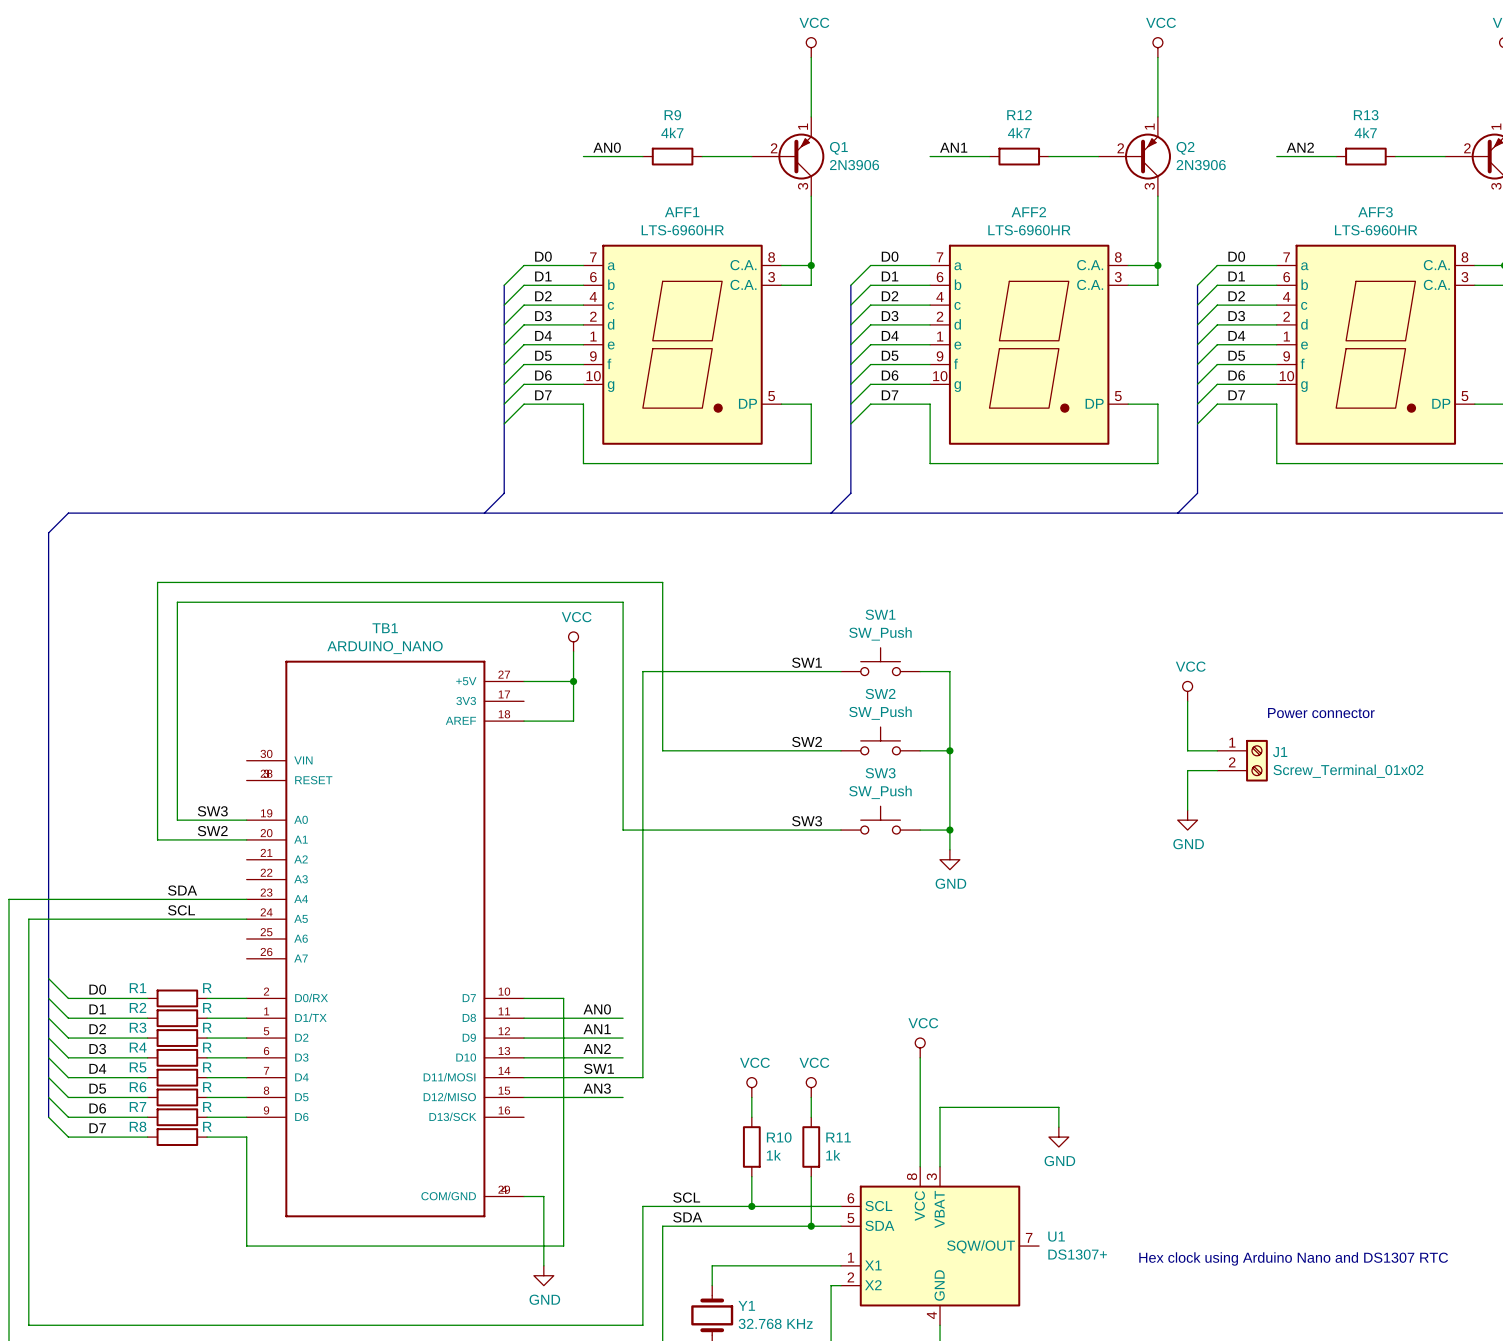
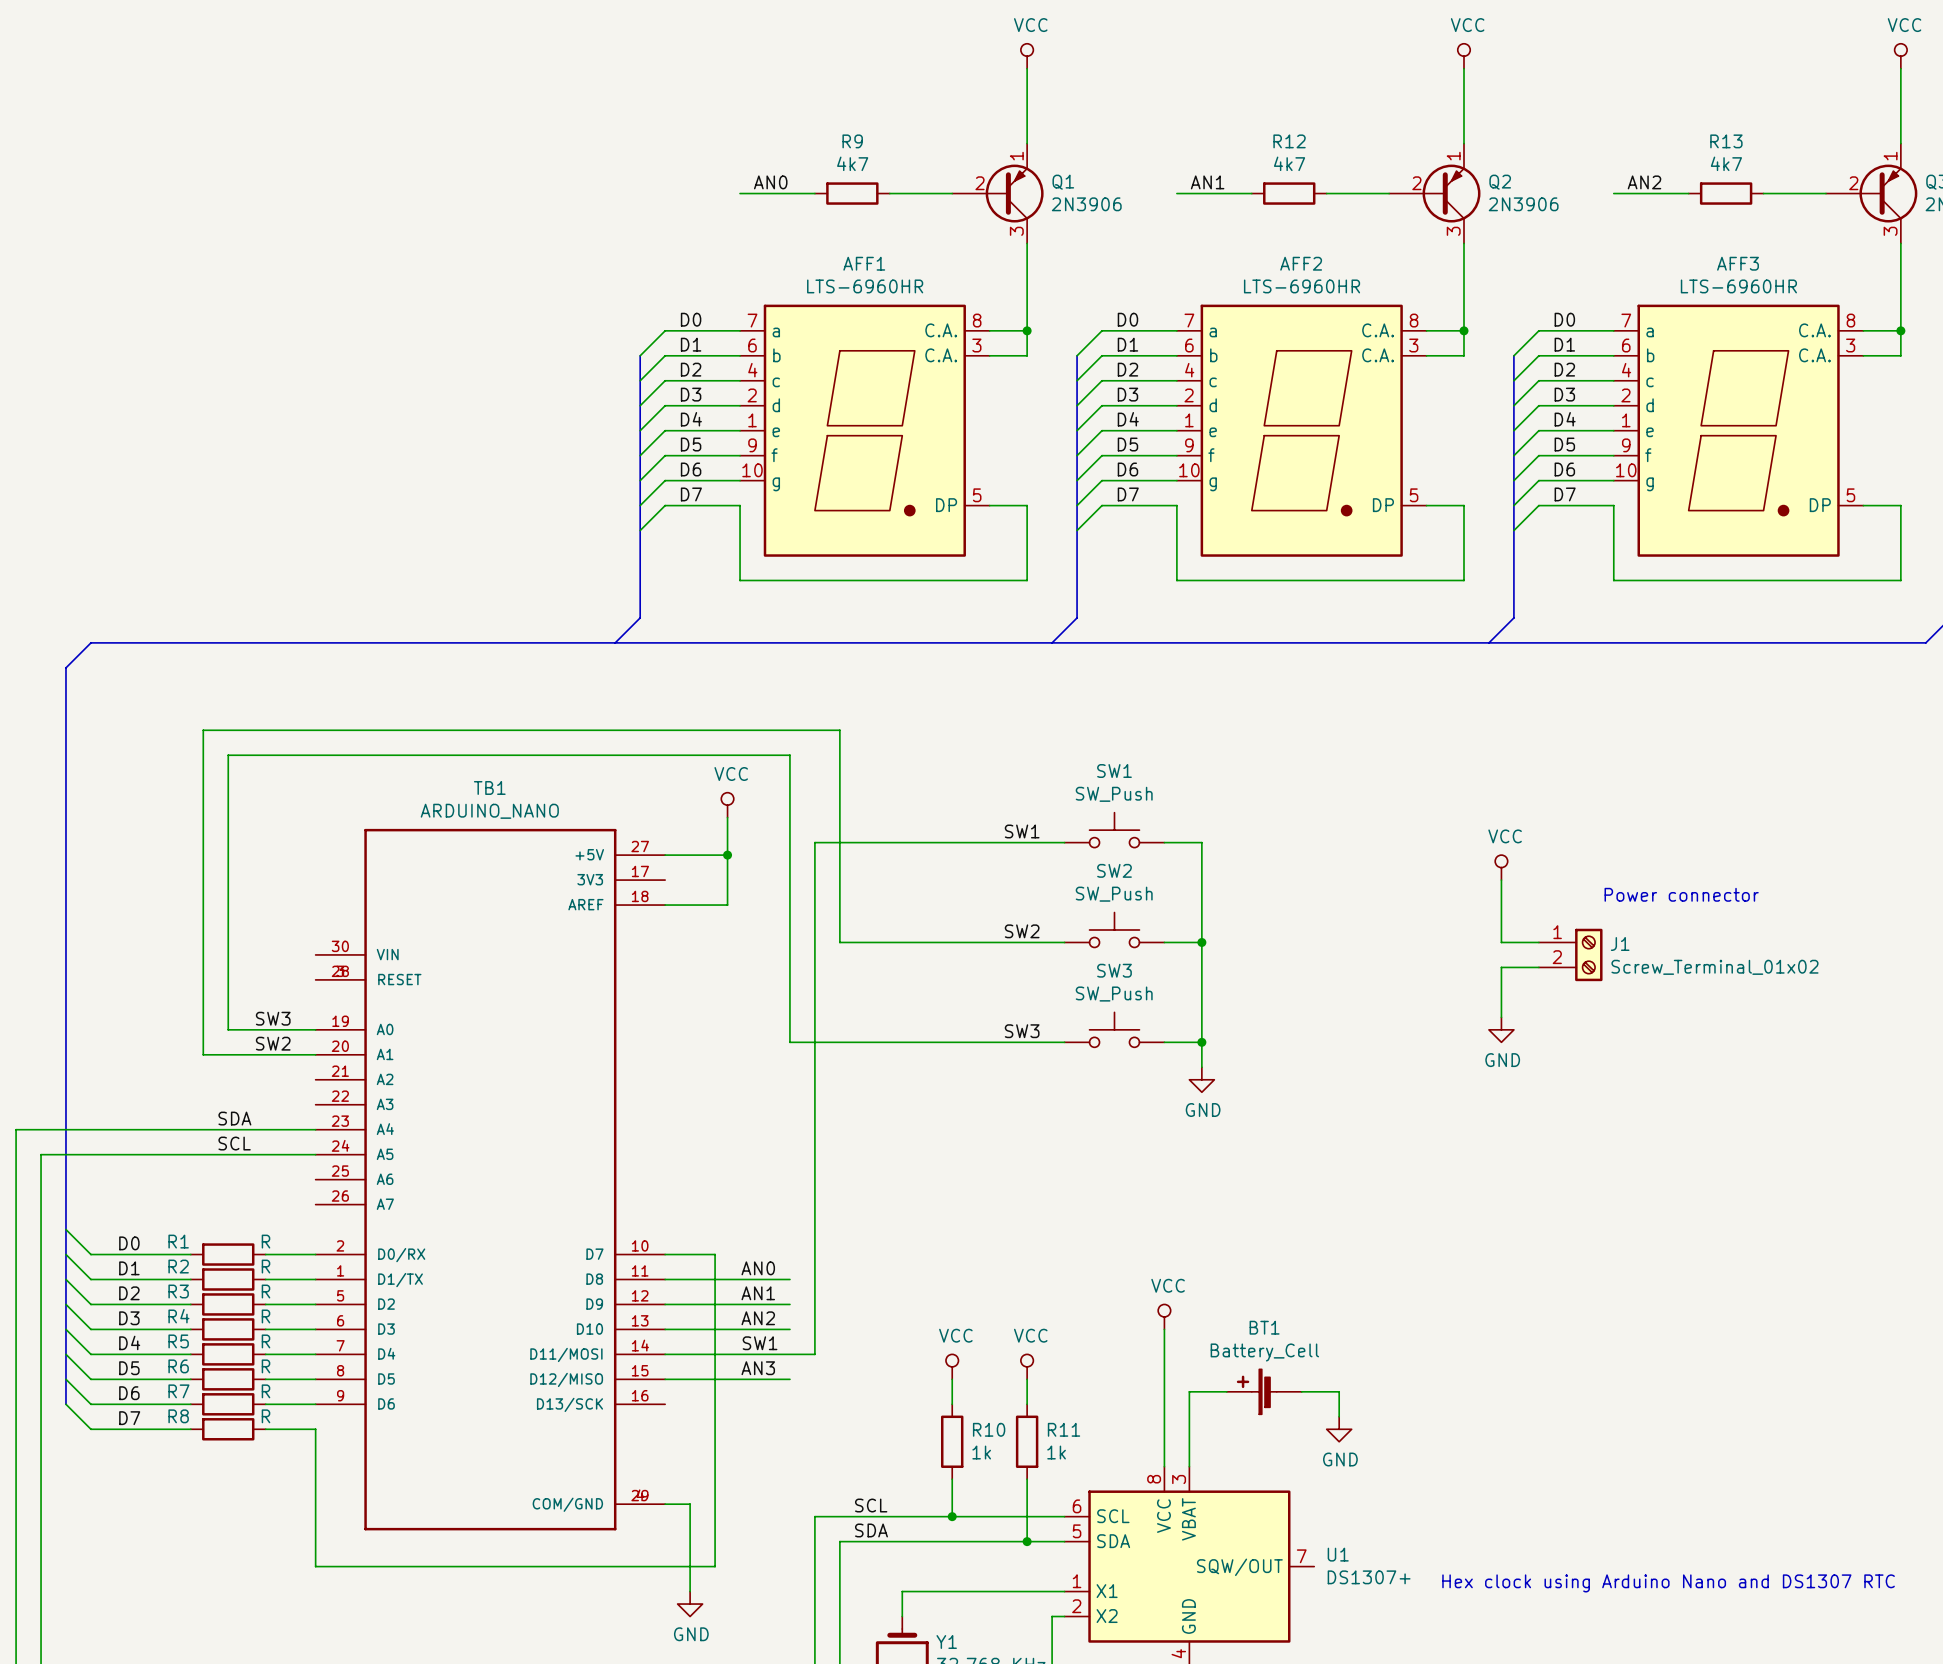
BT1: none -> Battery_Cell (1264, 1391)

